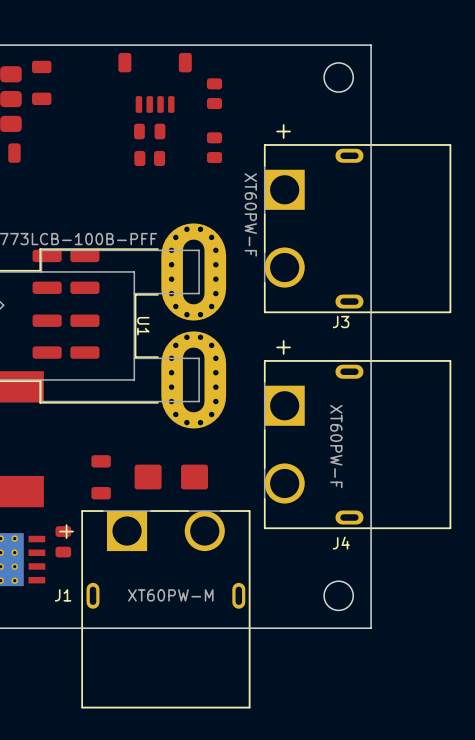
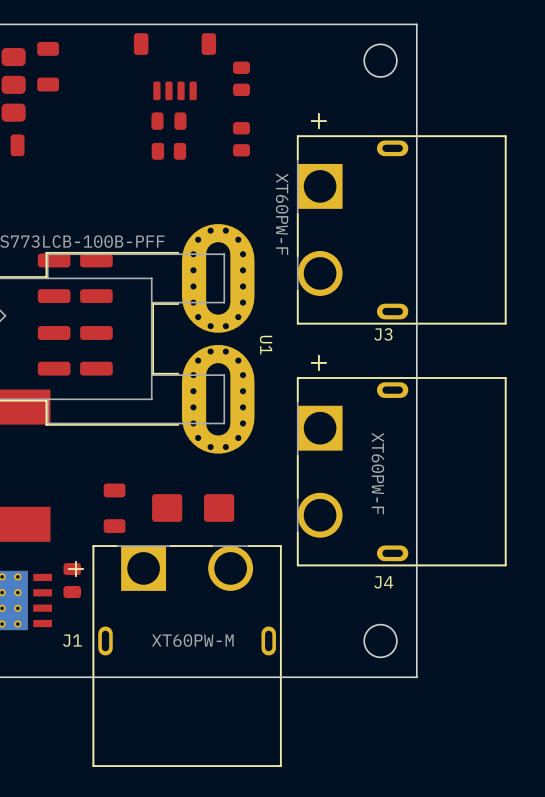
U1 name position: U1 (143, 326) -> U1 (266, 345)

